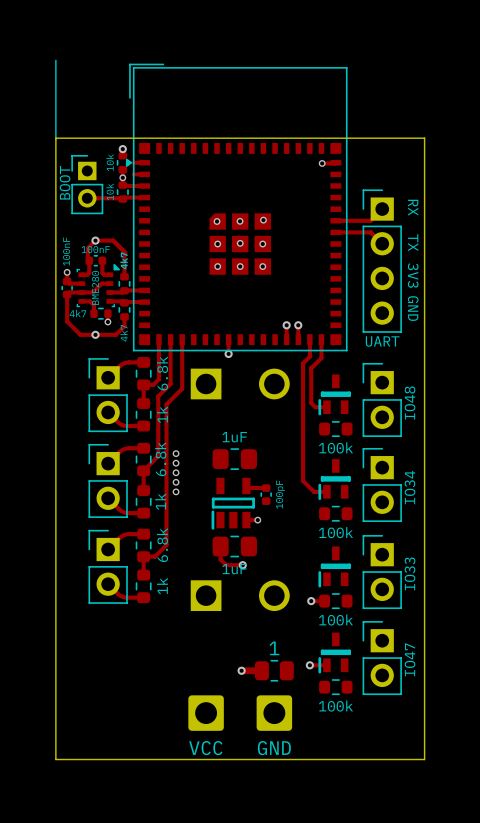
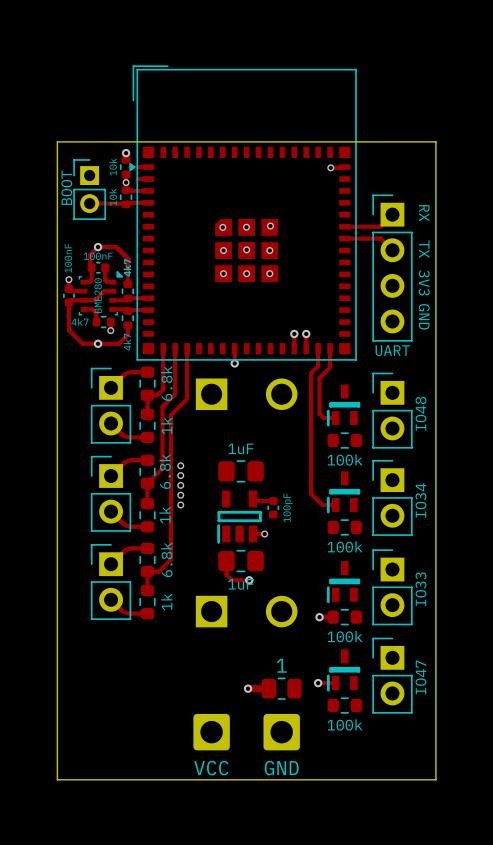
line: (55, 60) (55, 139) -> none

